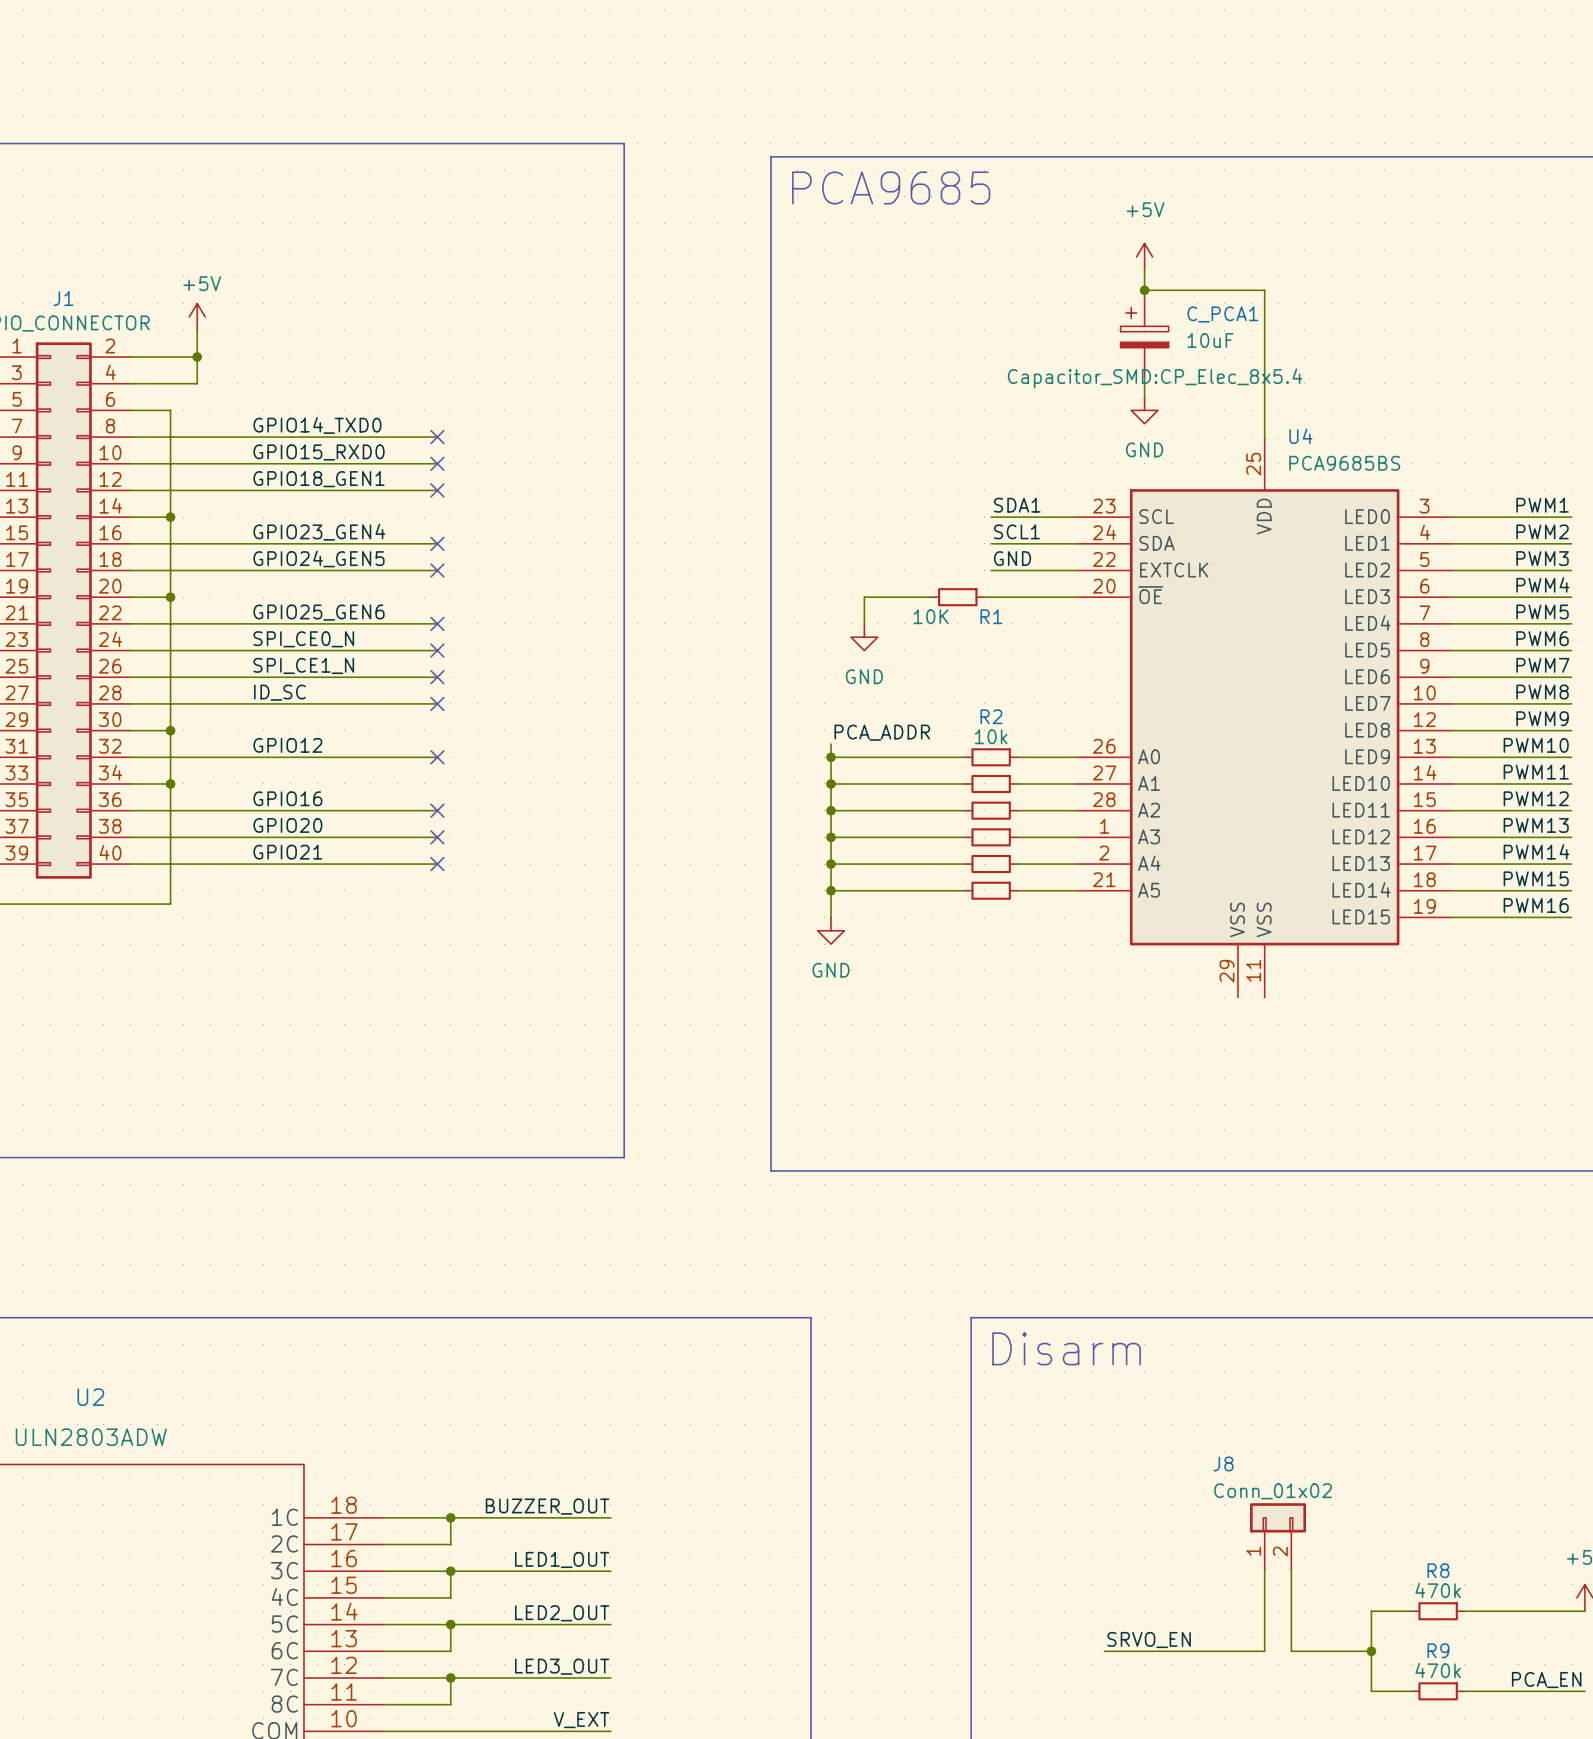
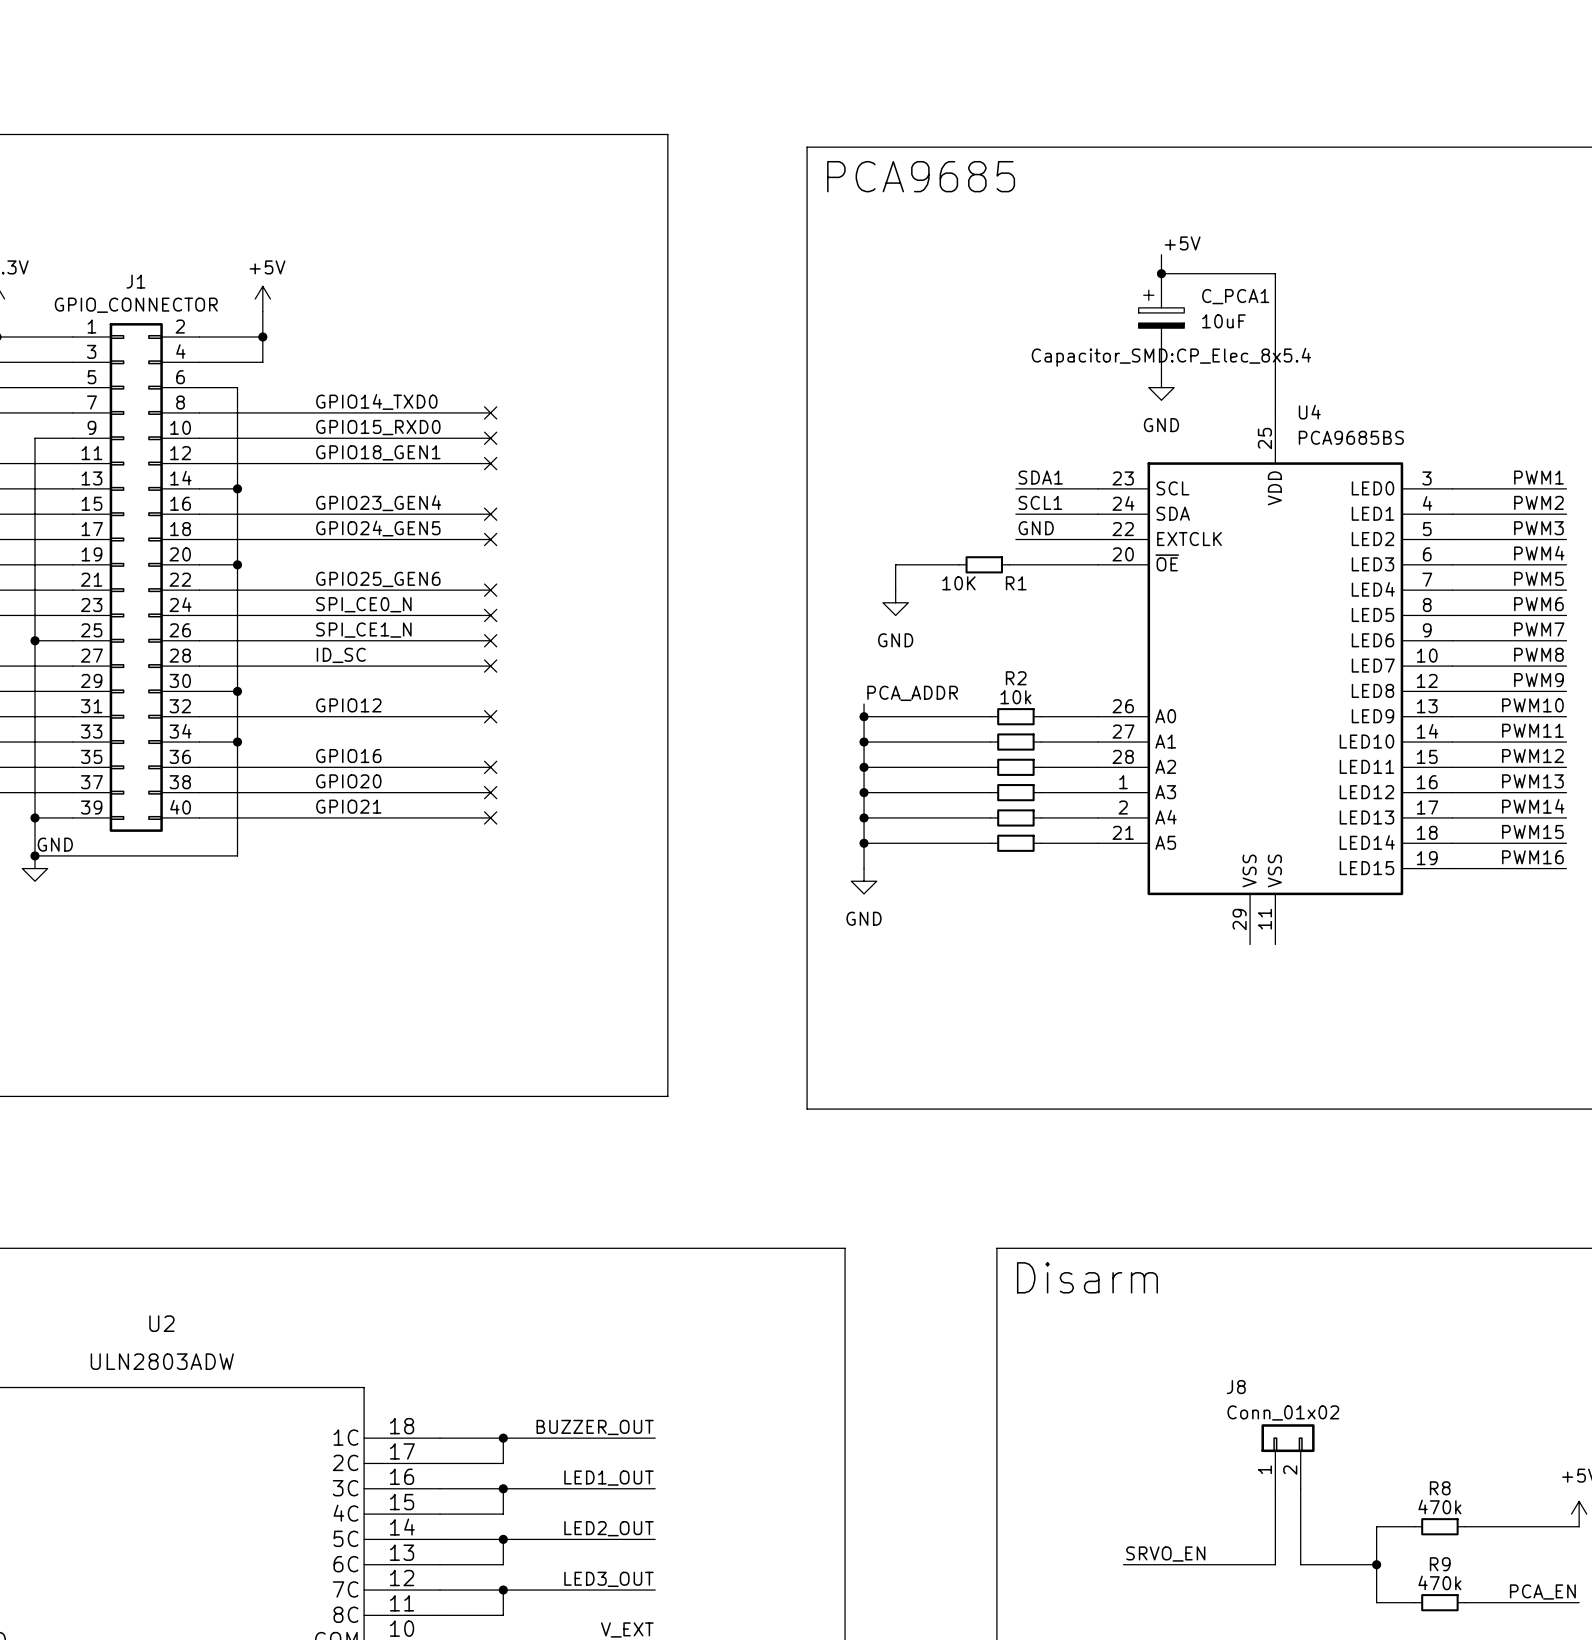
power symbol: +5V (1144, 256) -> none
label: none -> +5V (1182, 243)

